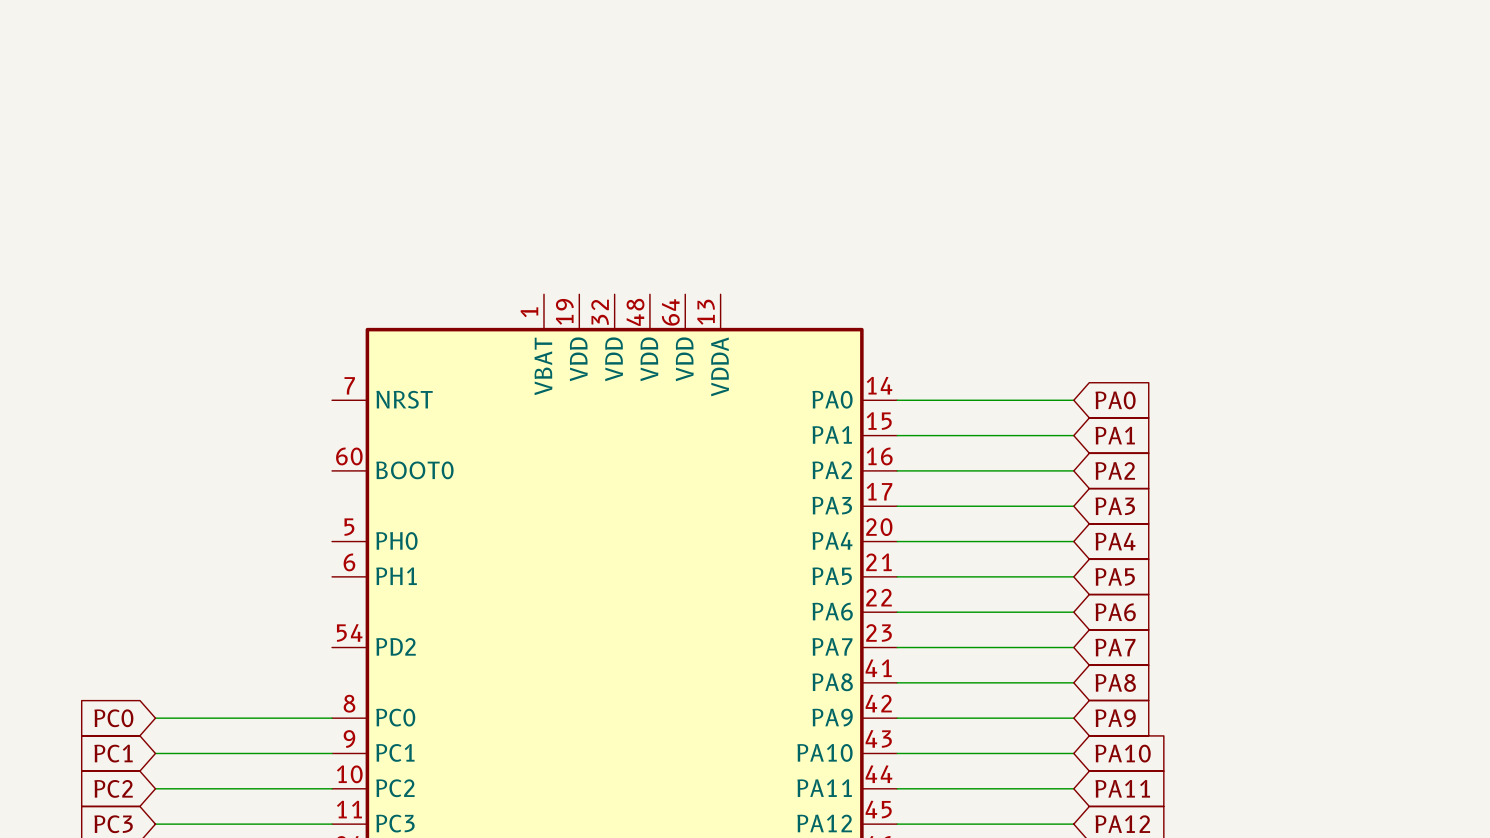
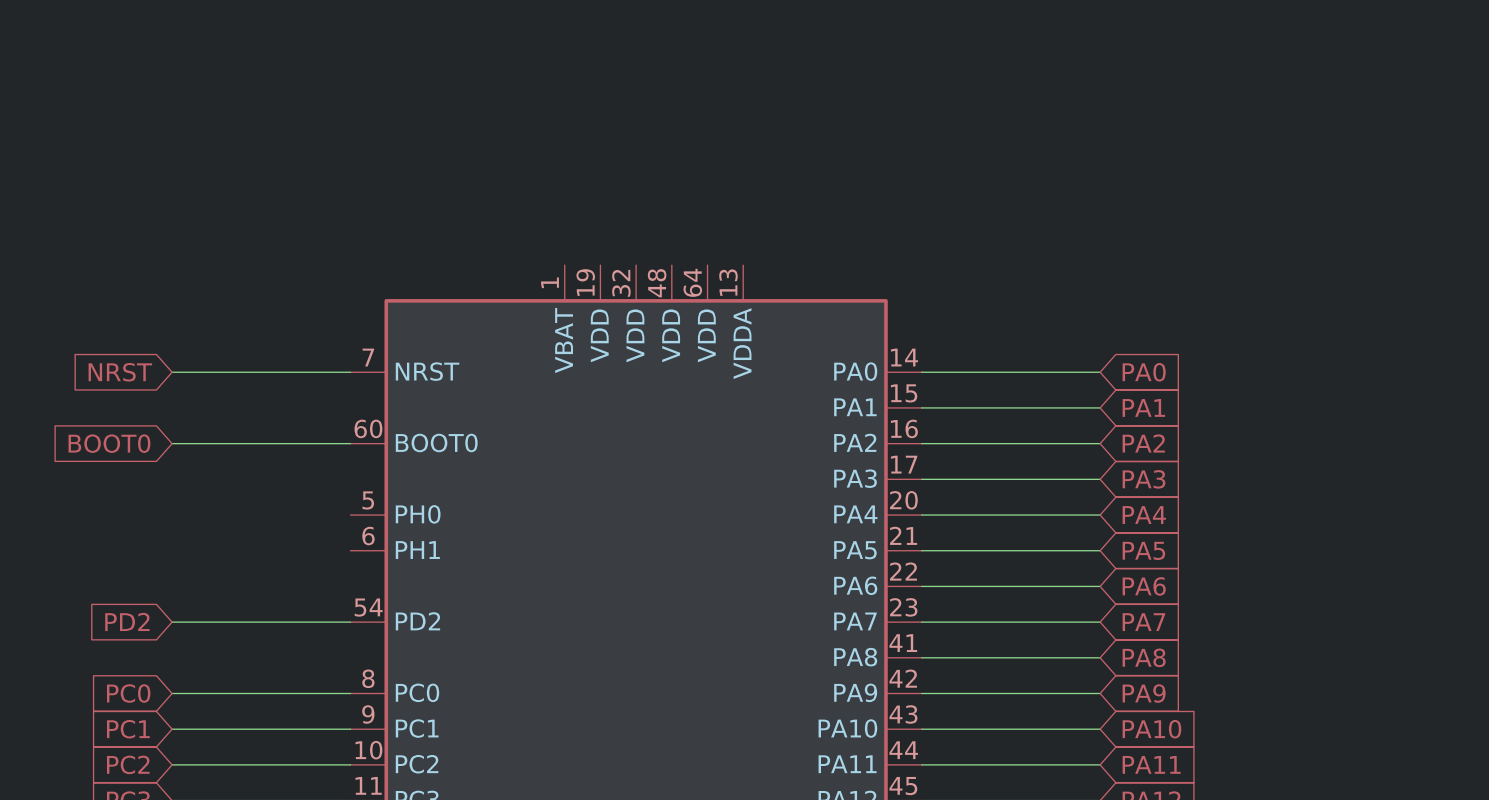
global label: none -> NRST (120, 372)
wire: none -> (172, 372) (350, 372)
wire: none -> (172, 443) (350, 443)
global label: none -> BOOT0 (109, 443)
global label: none -> PD2 (127, 621)
wire: none -> (172, 622) (350, 622)

